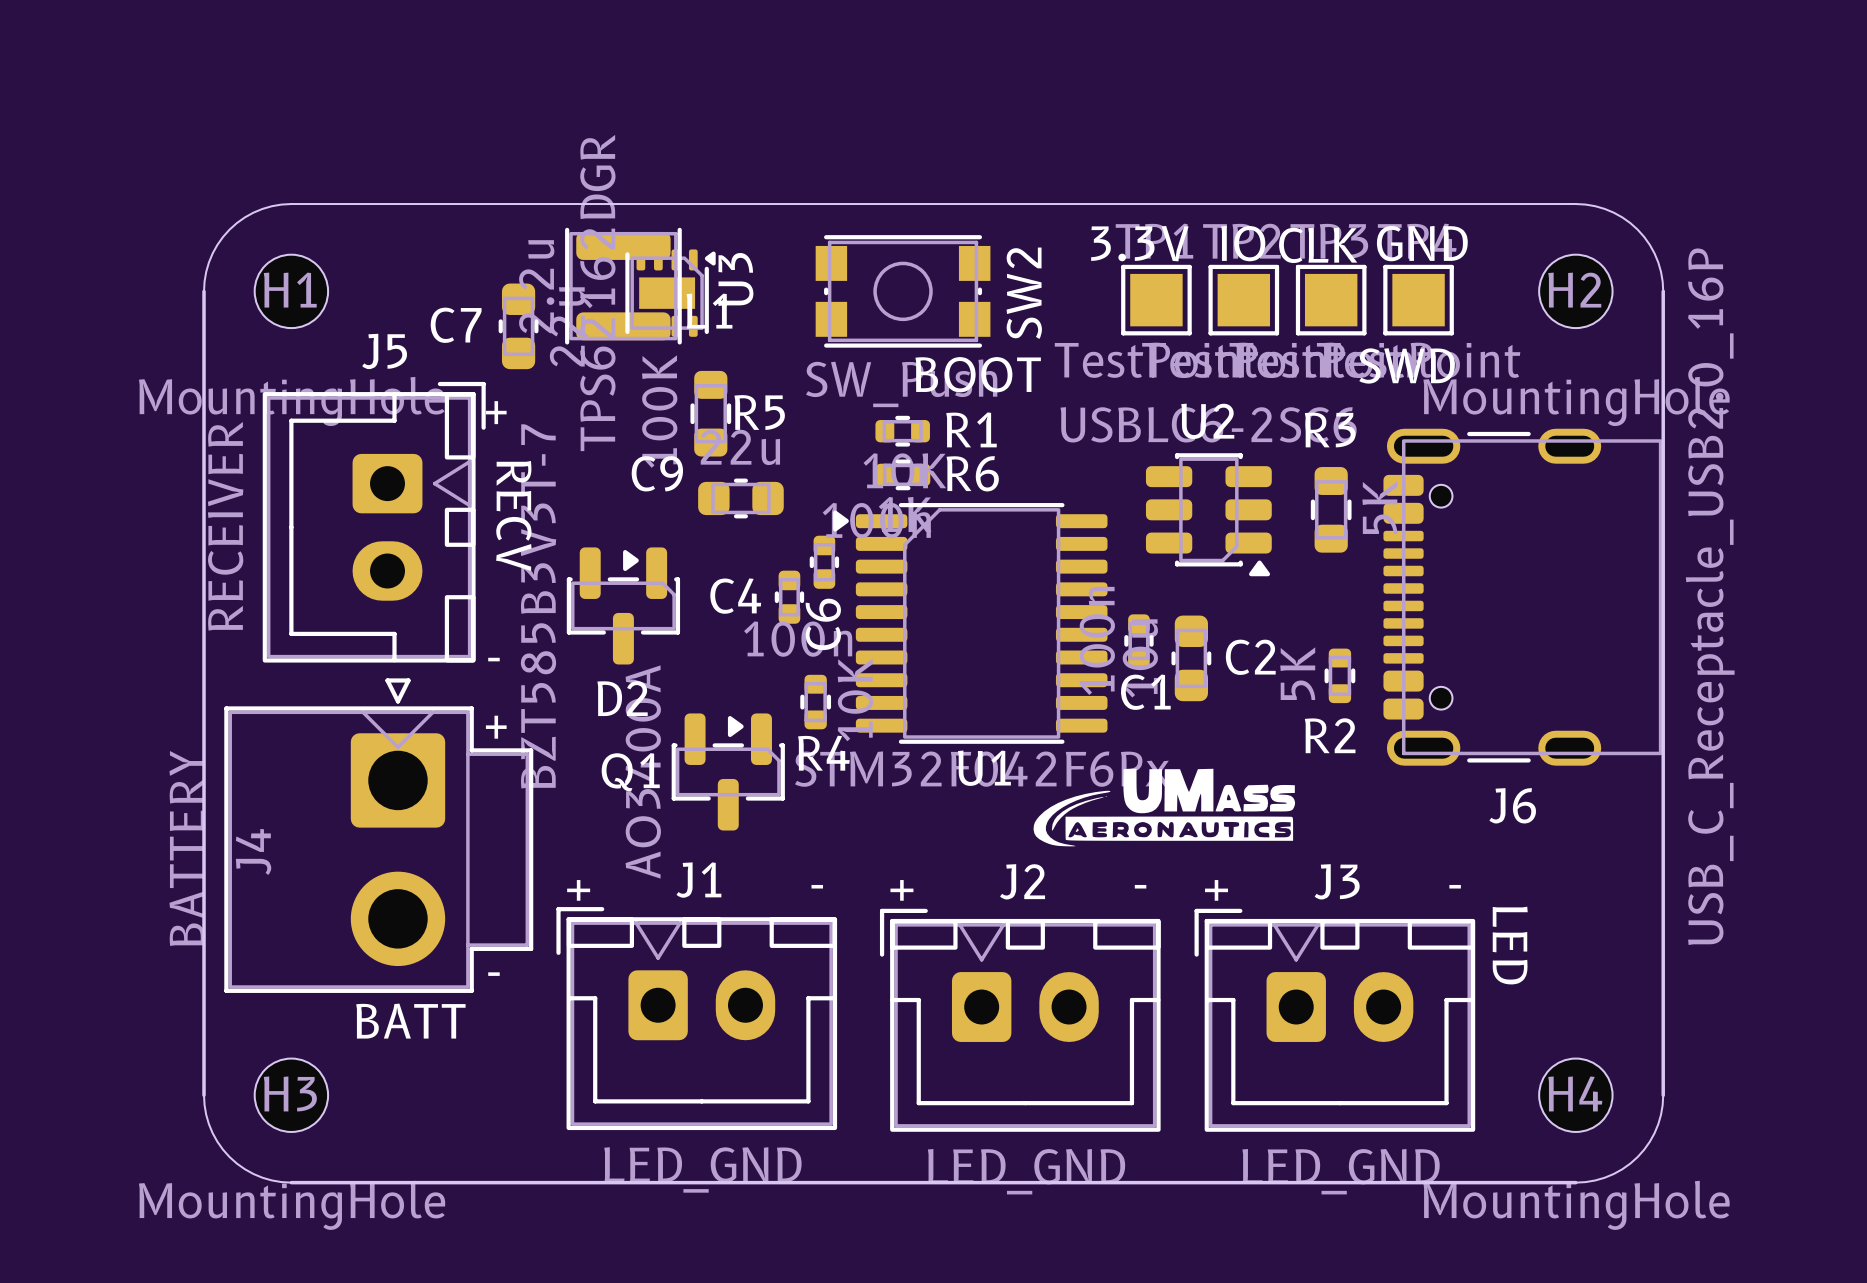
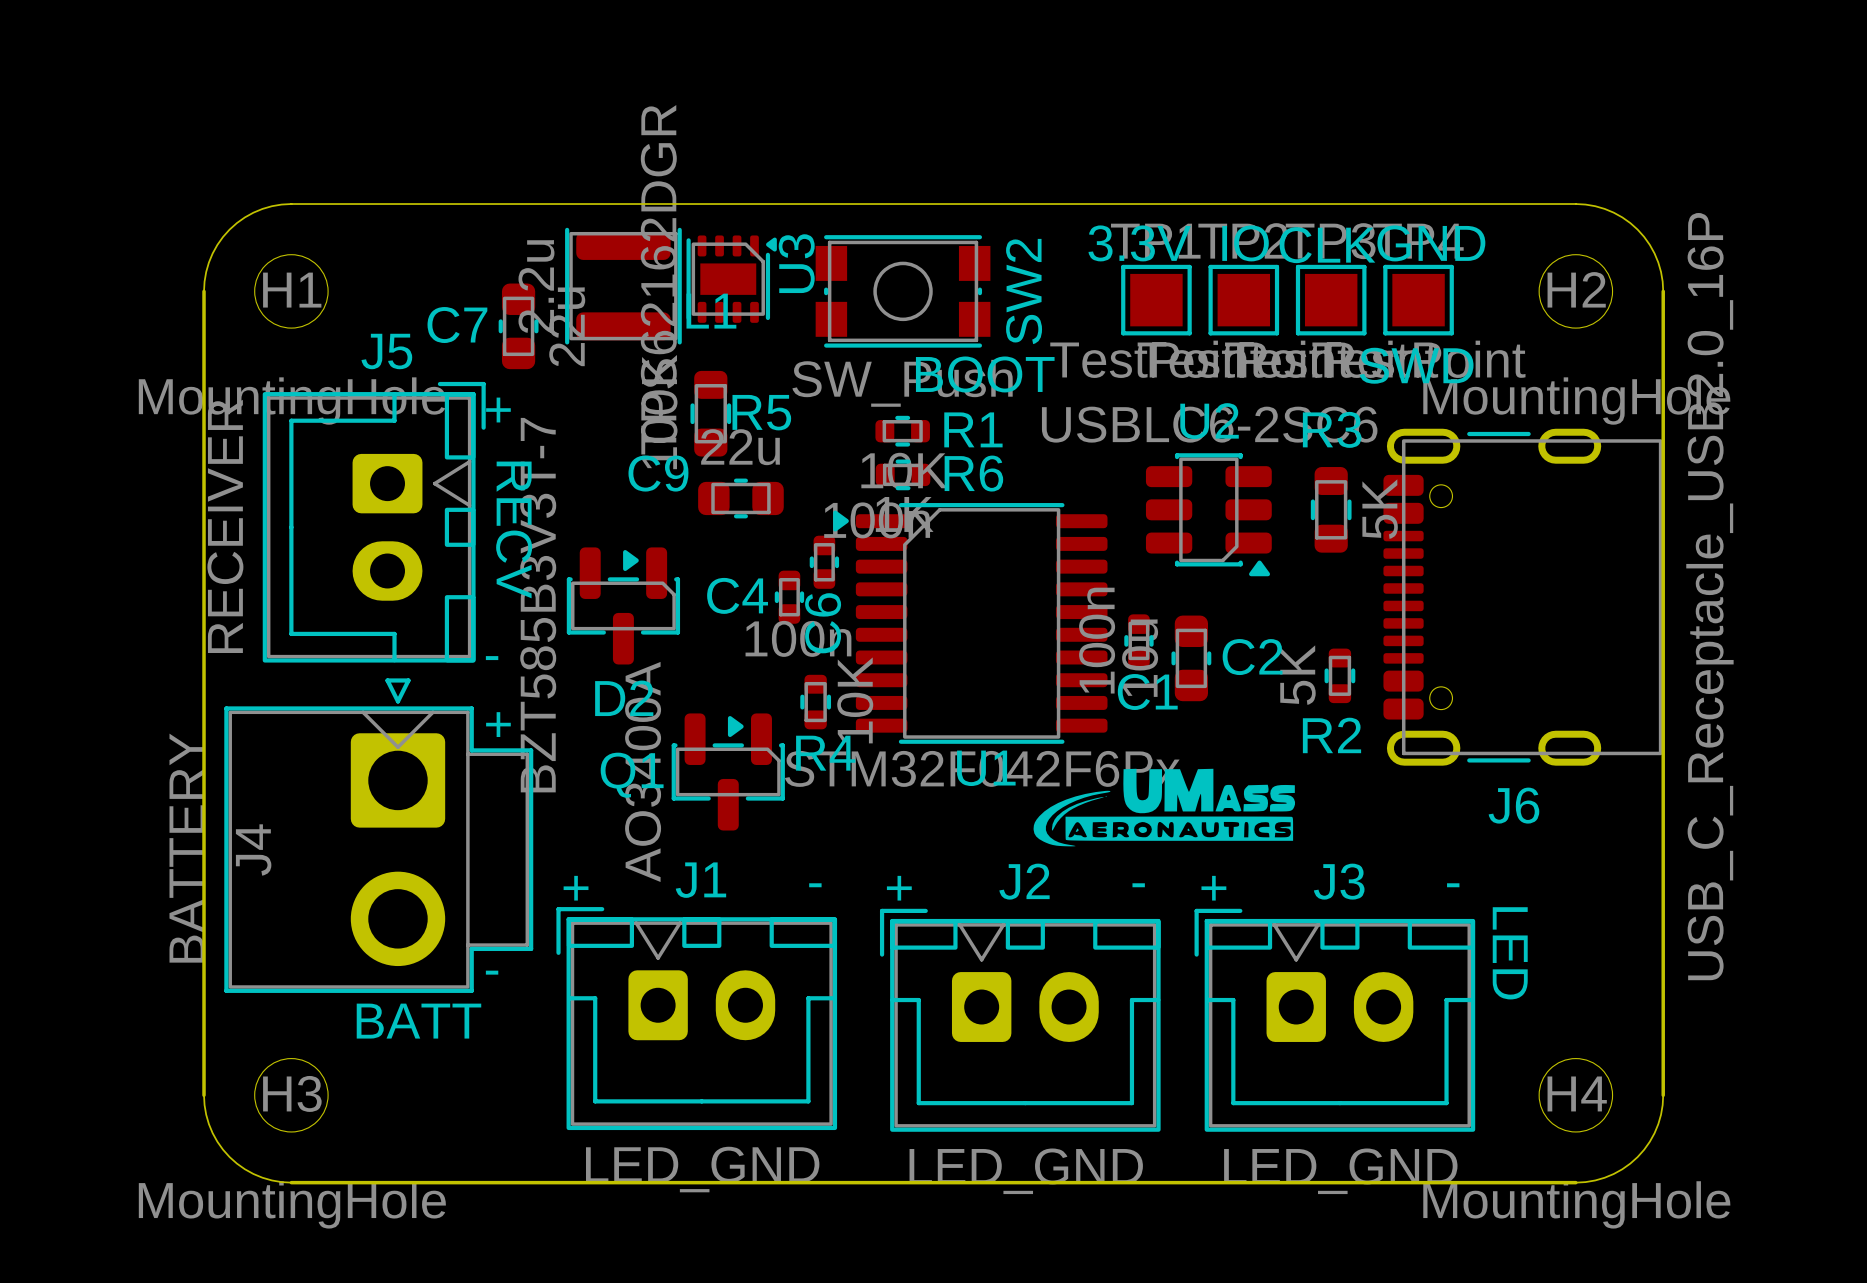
U3 position: (670, 293) -> (731, 279)

